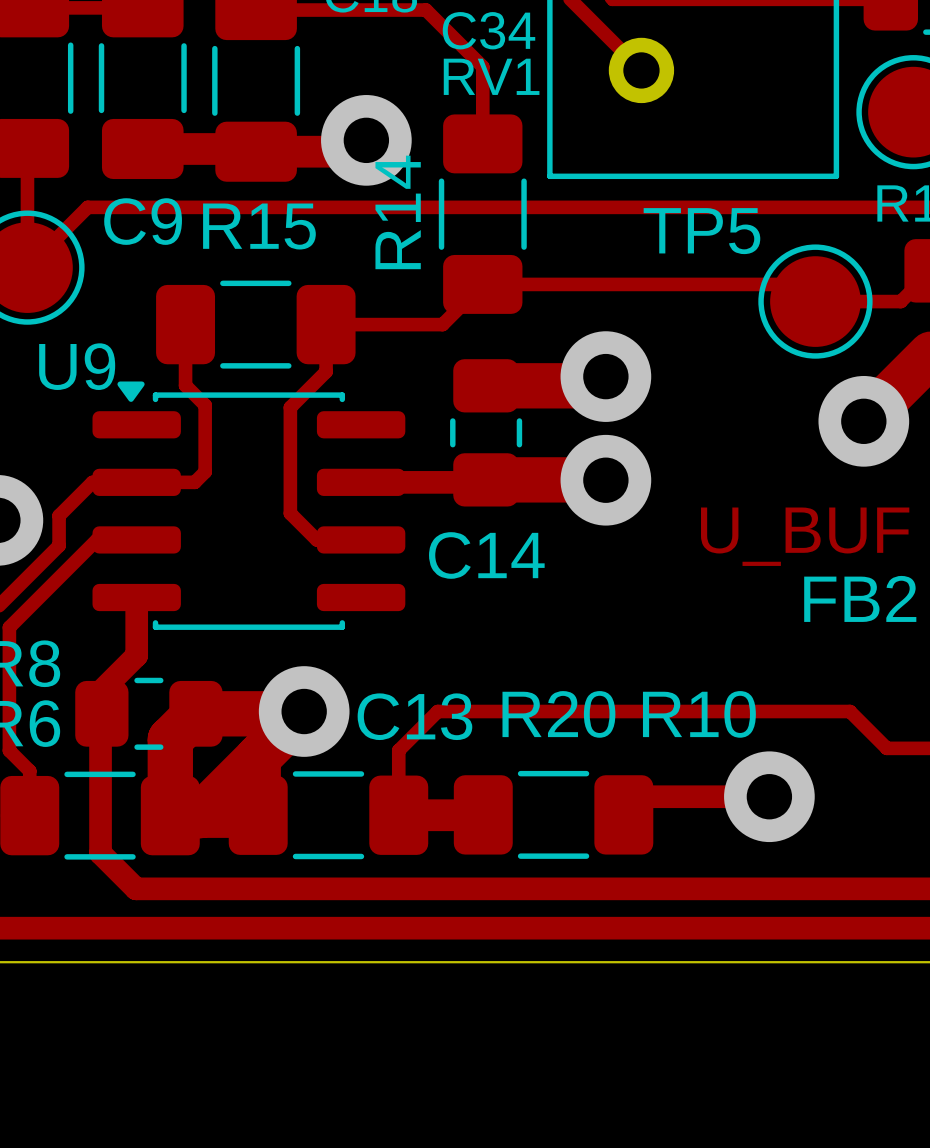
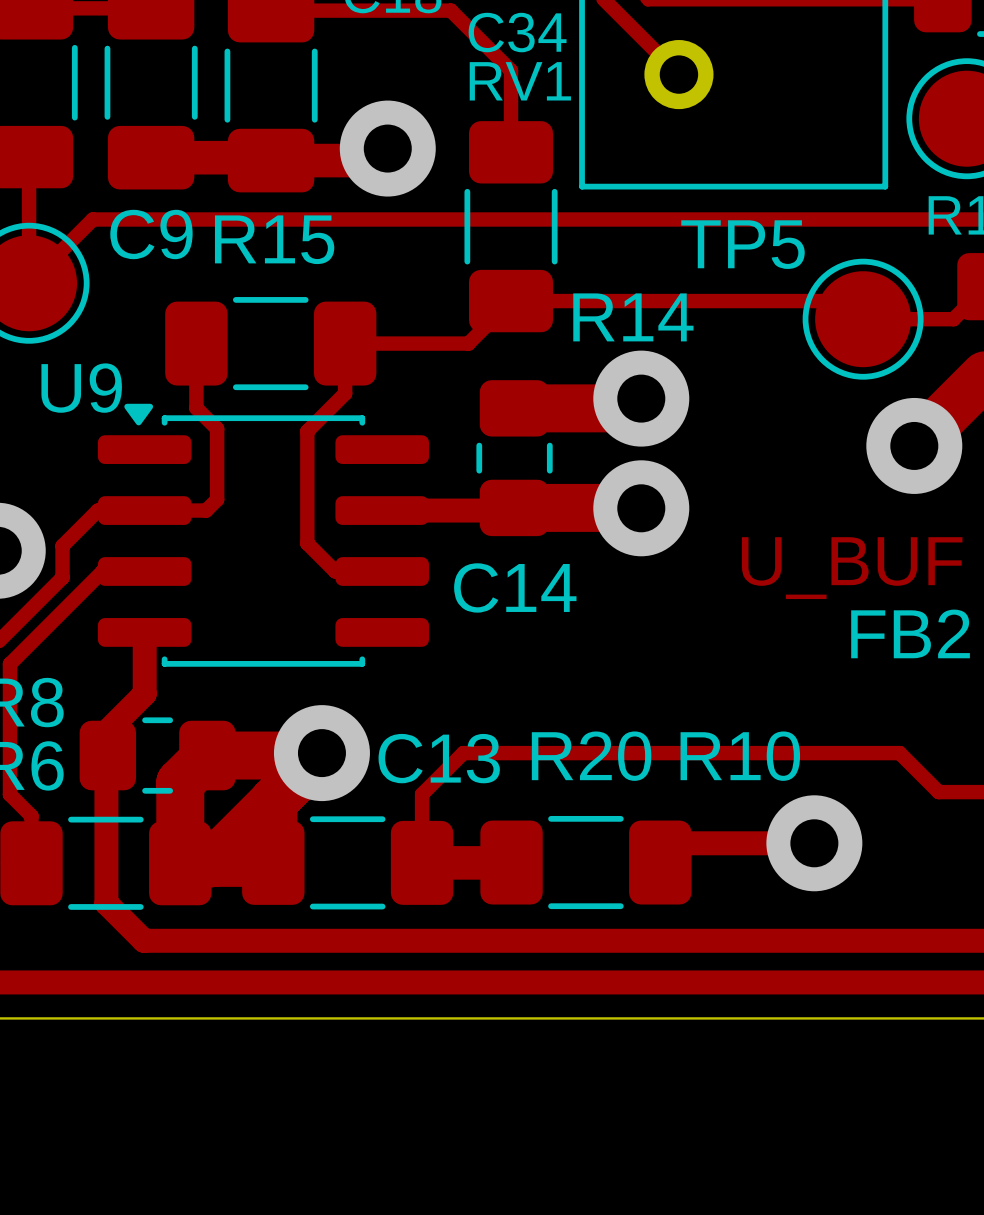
R14 name rotation: 0° (398, 212) -> 90° clockwise (633, 317)
R14 name position: R14 (398, 212) -> R14 (633, 317)

